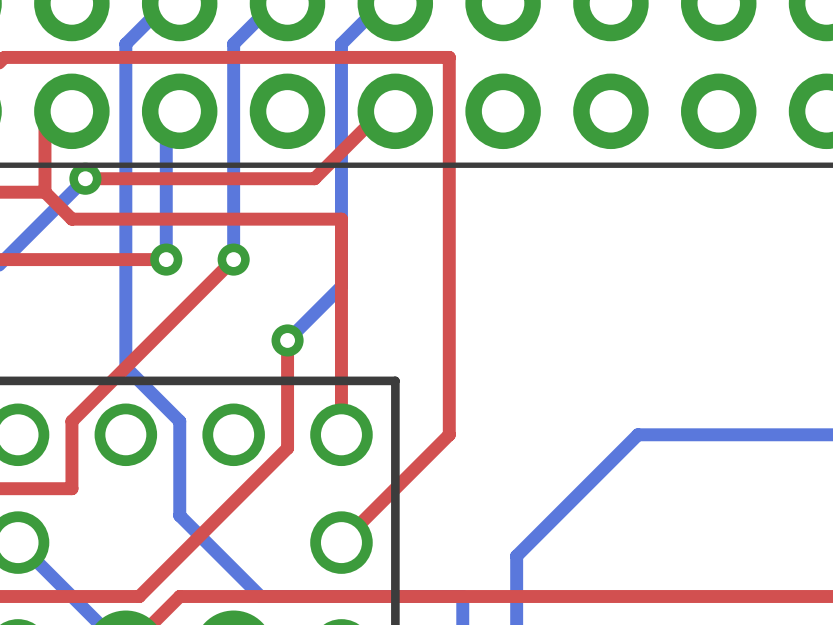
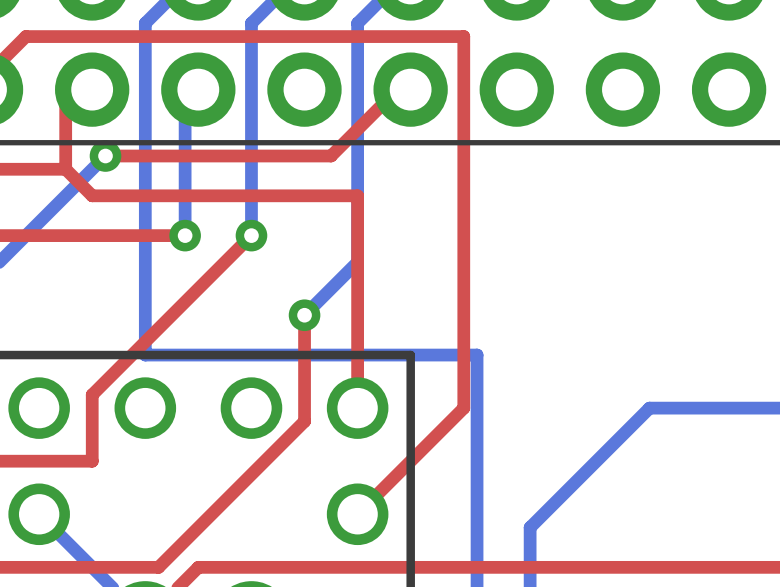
bottom track: (125, 367) (179, 421) (179, 515) (260, 596) (462, 596) -> (145, 341) (145, 355) (477, 355) (477, 567)

